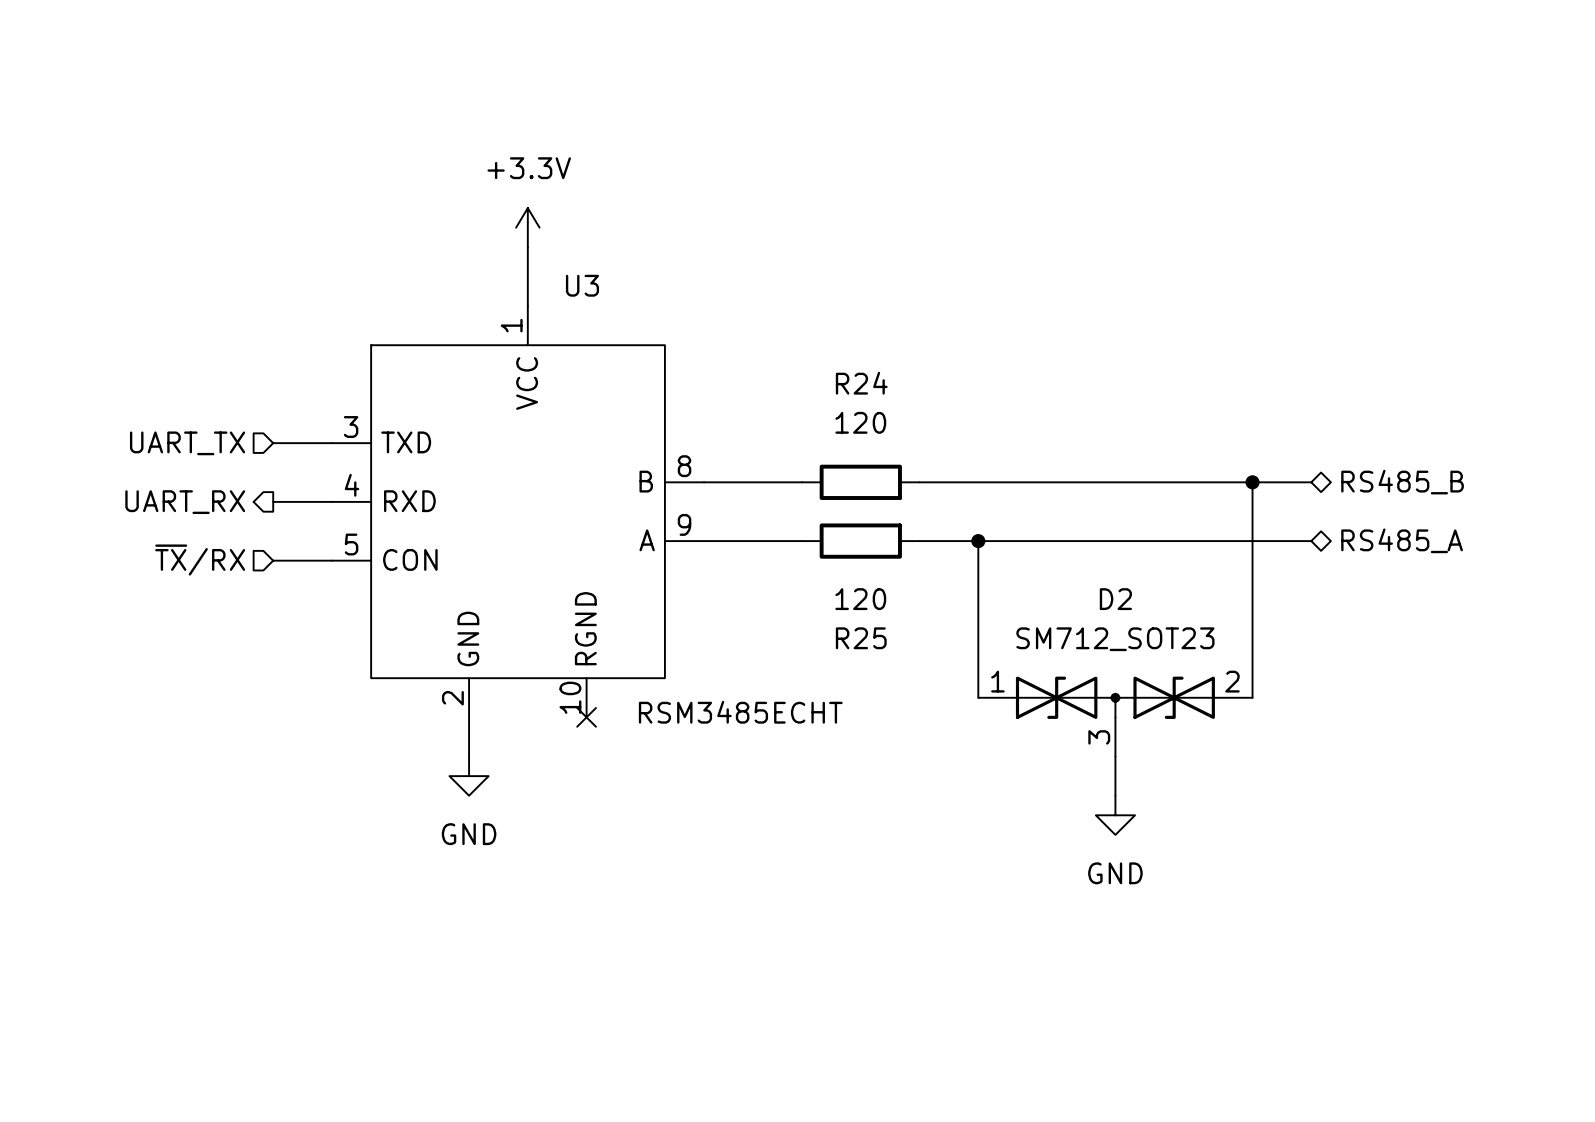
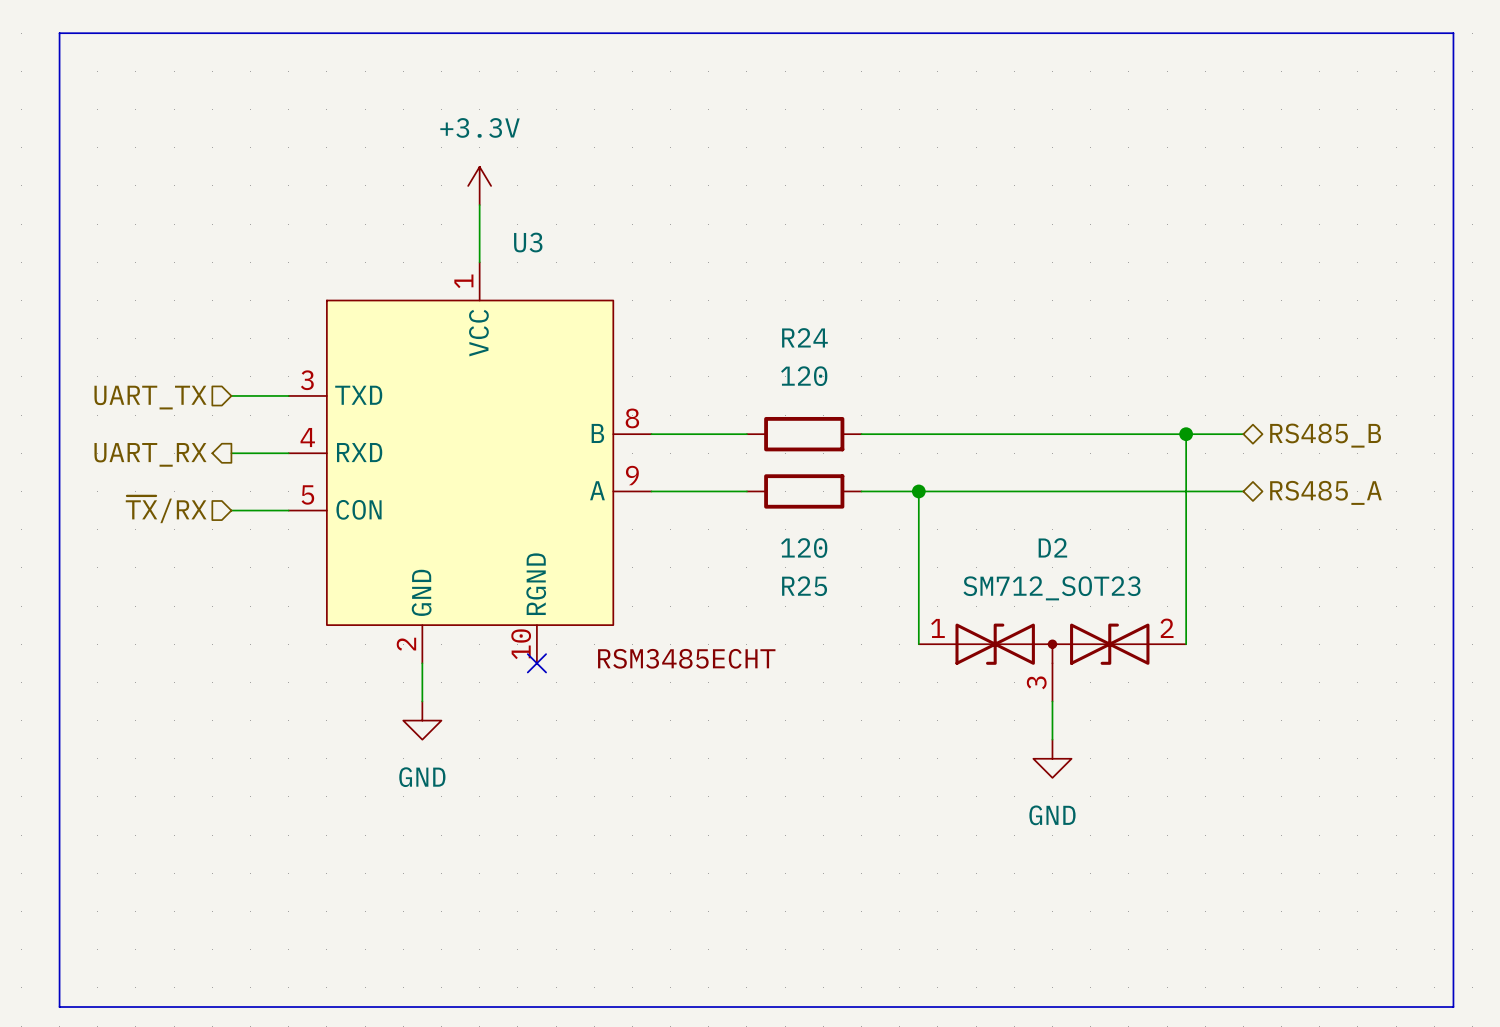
line: none -> (59, 33) (1453, 33) (1453, 1007) (59, 1007) (59, 33)

